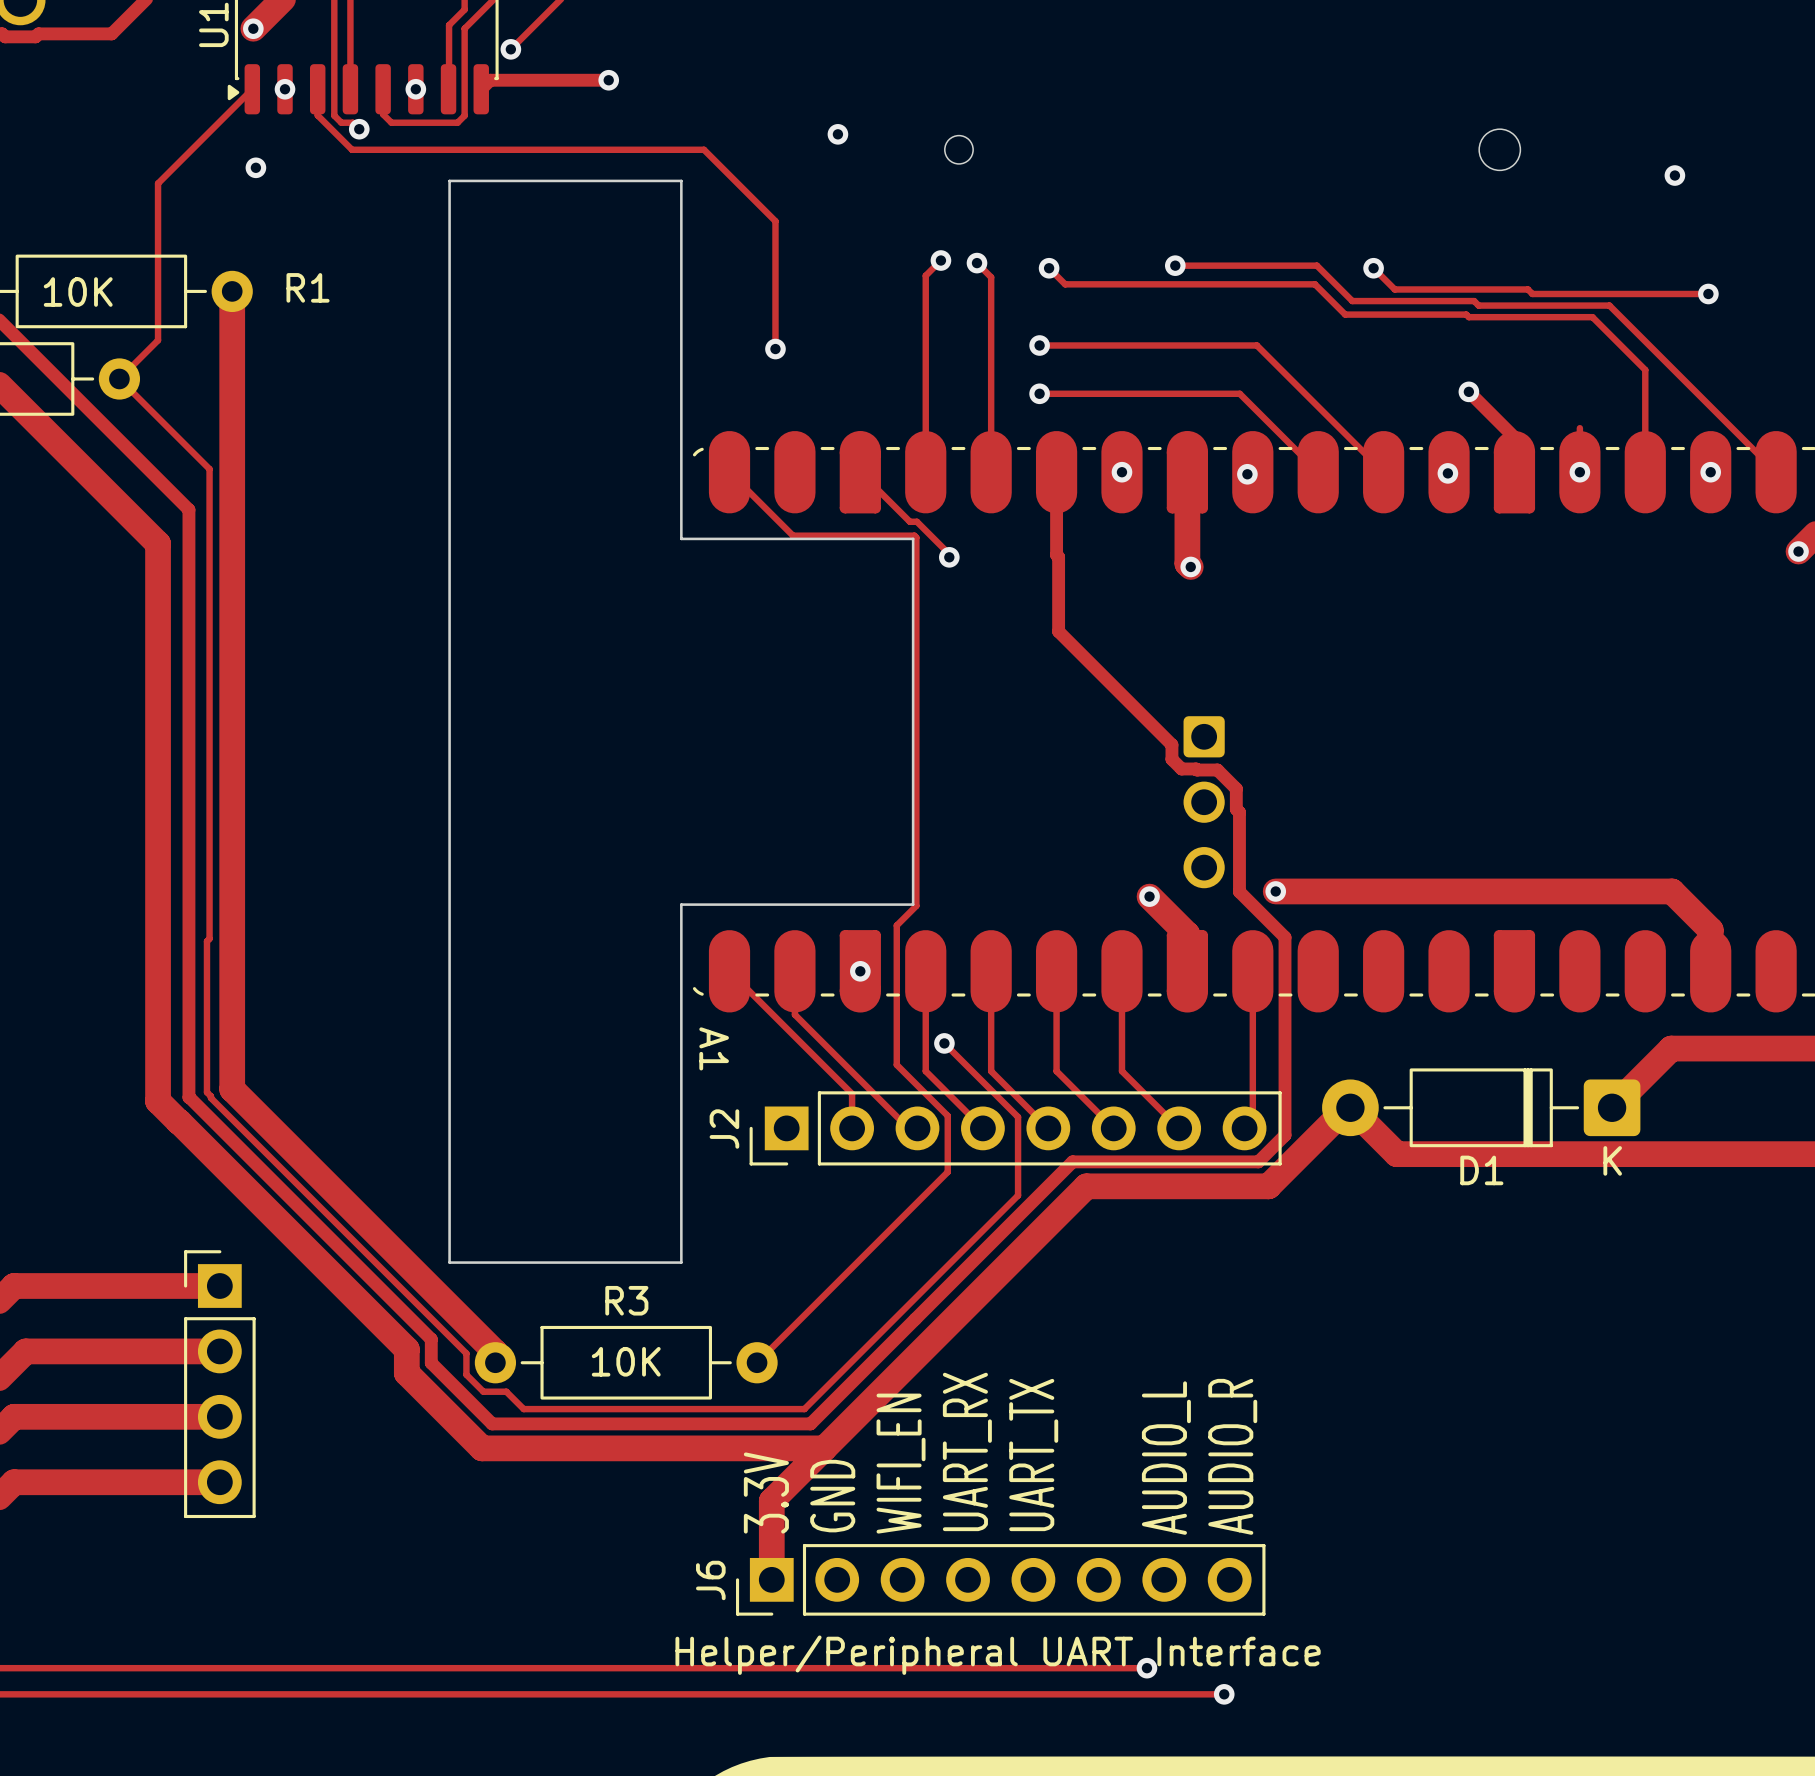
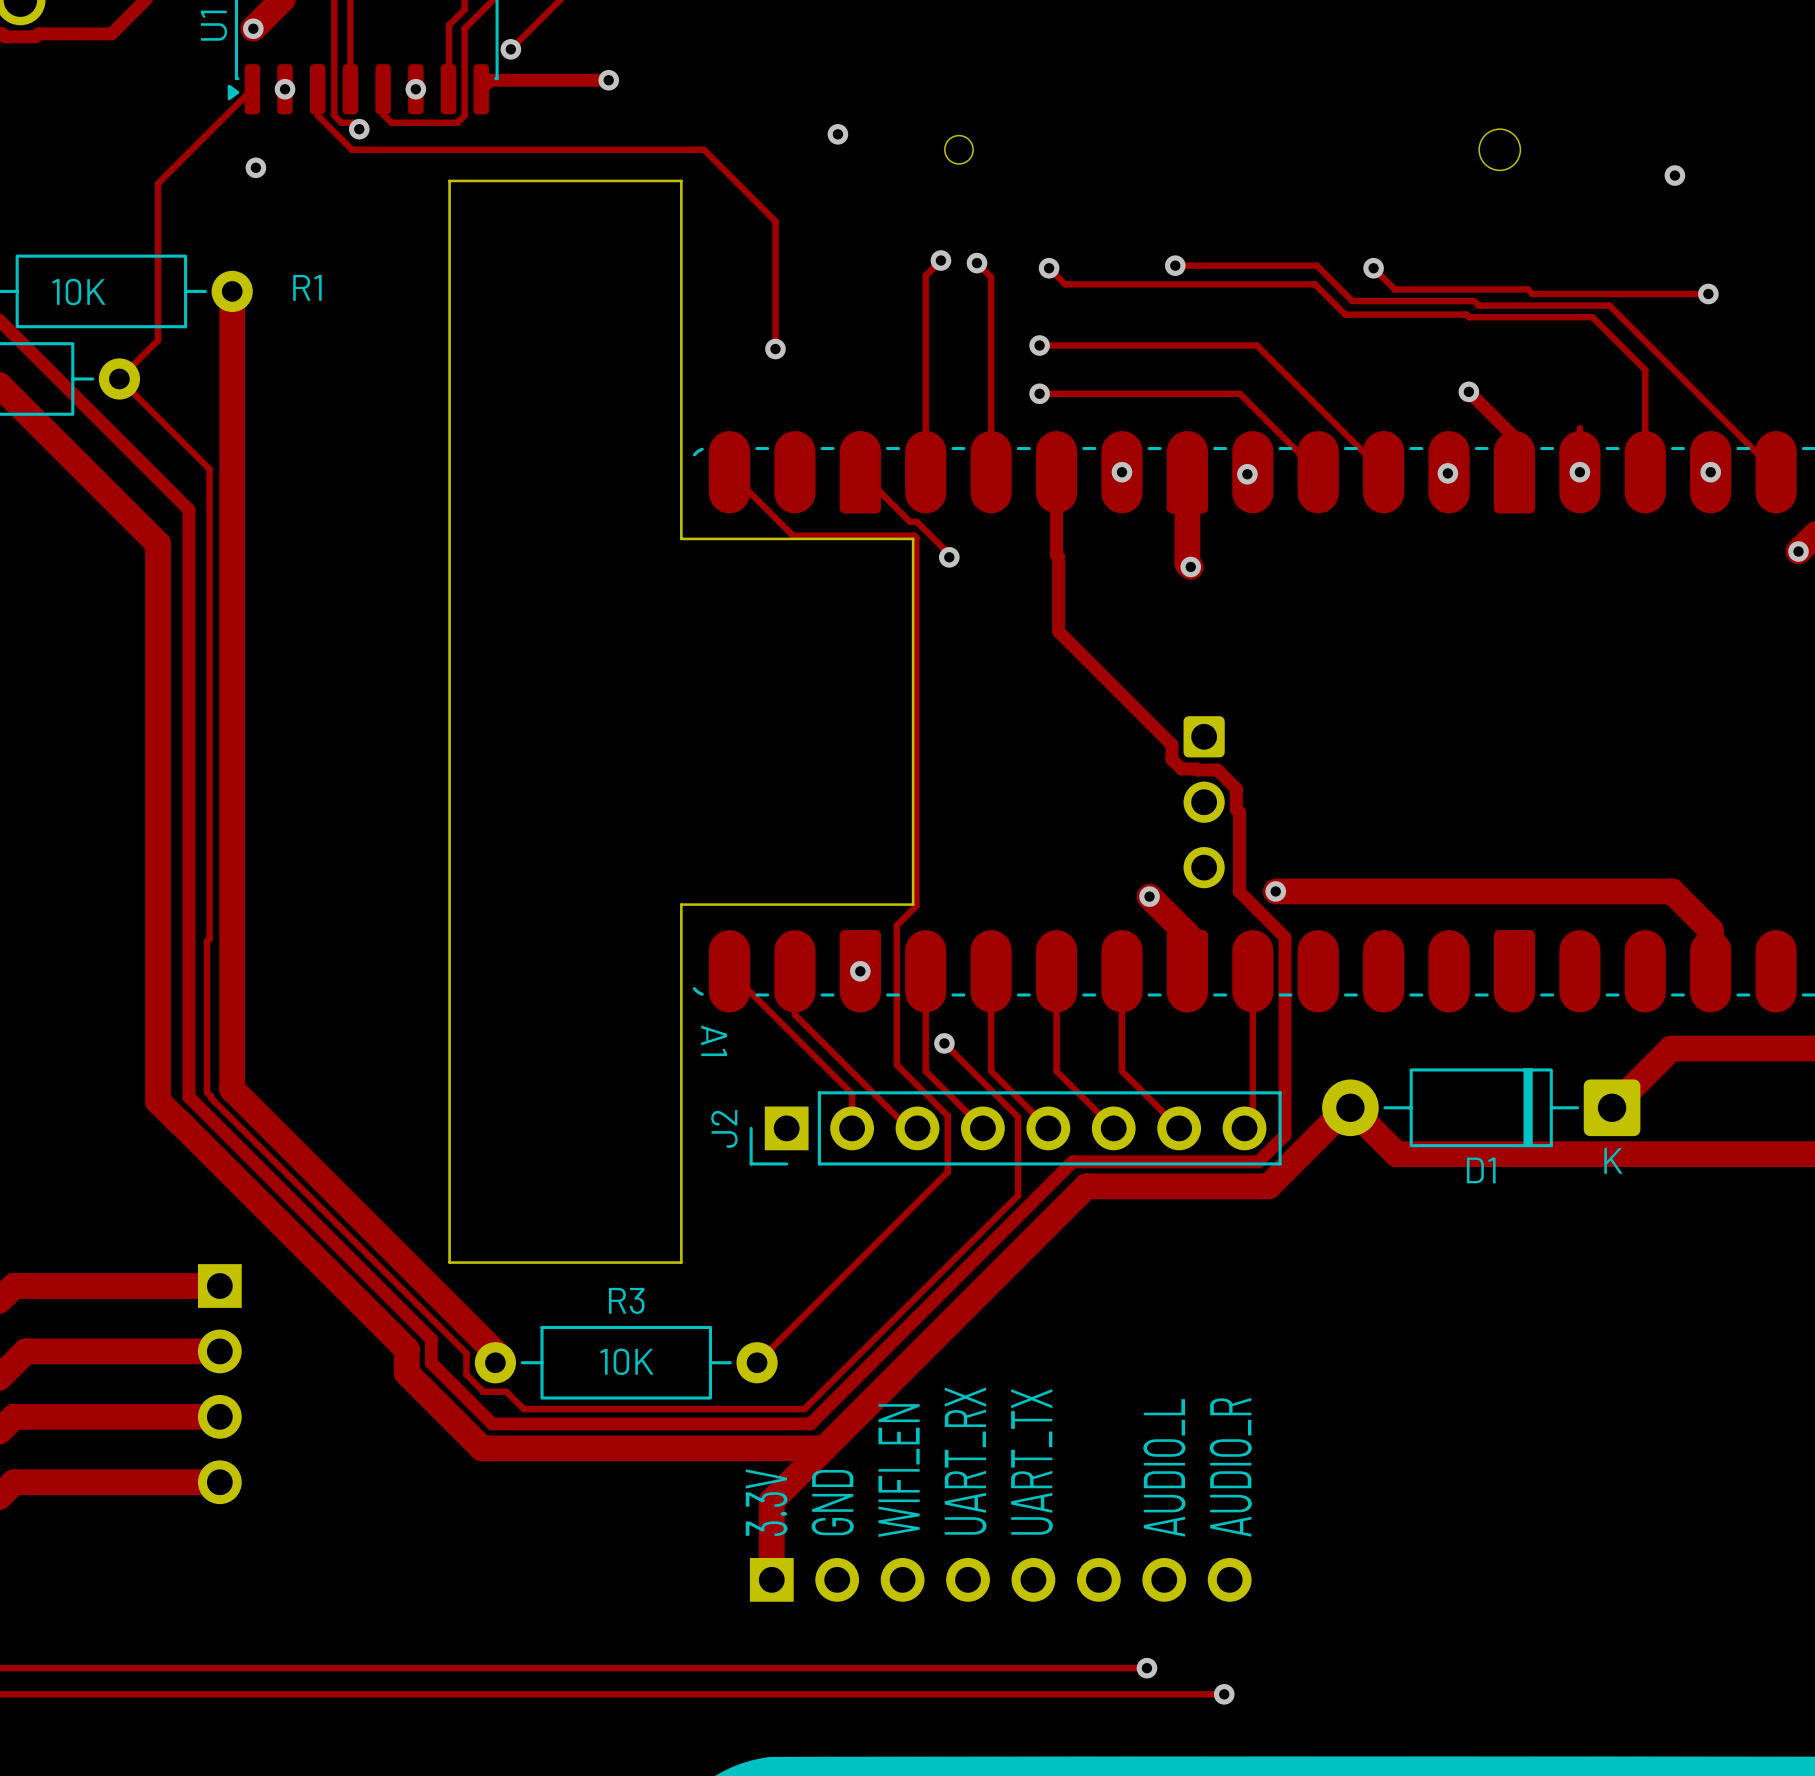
part side: top (219, 1384) -> bottom (219, 1384)
J6 side: top (1000, 1579) -> bottom (1000, 1579)

